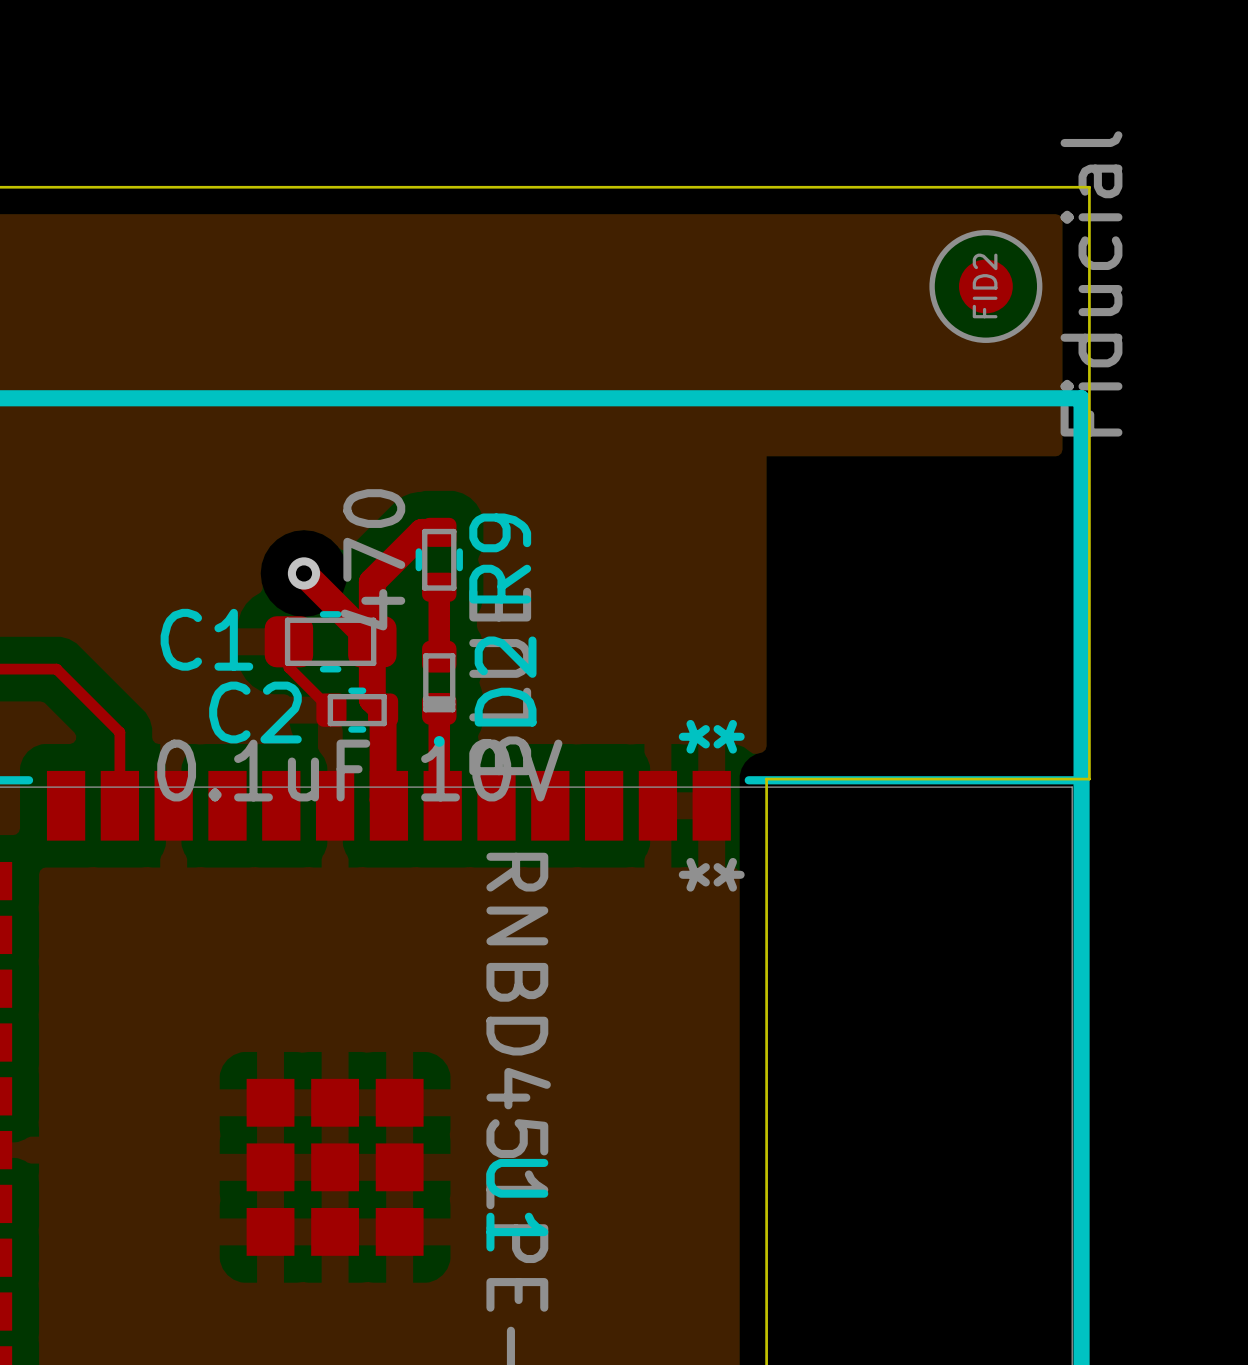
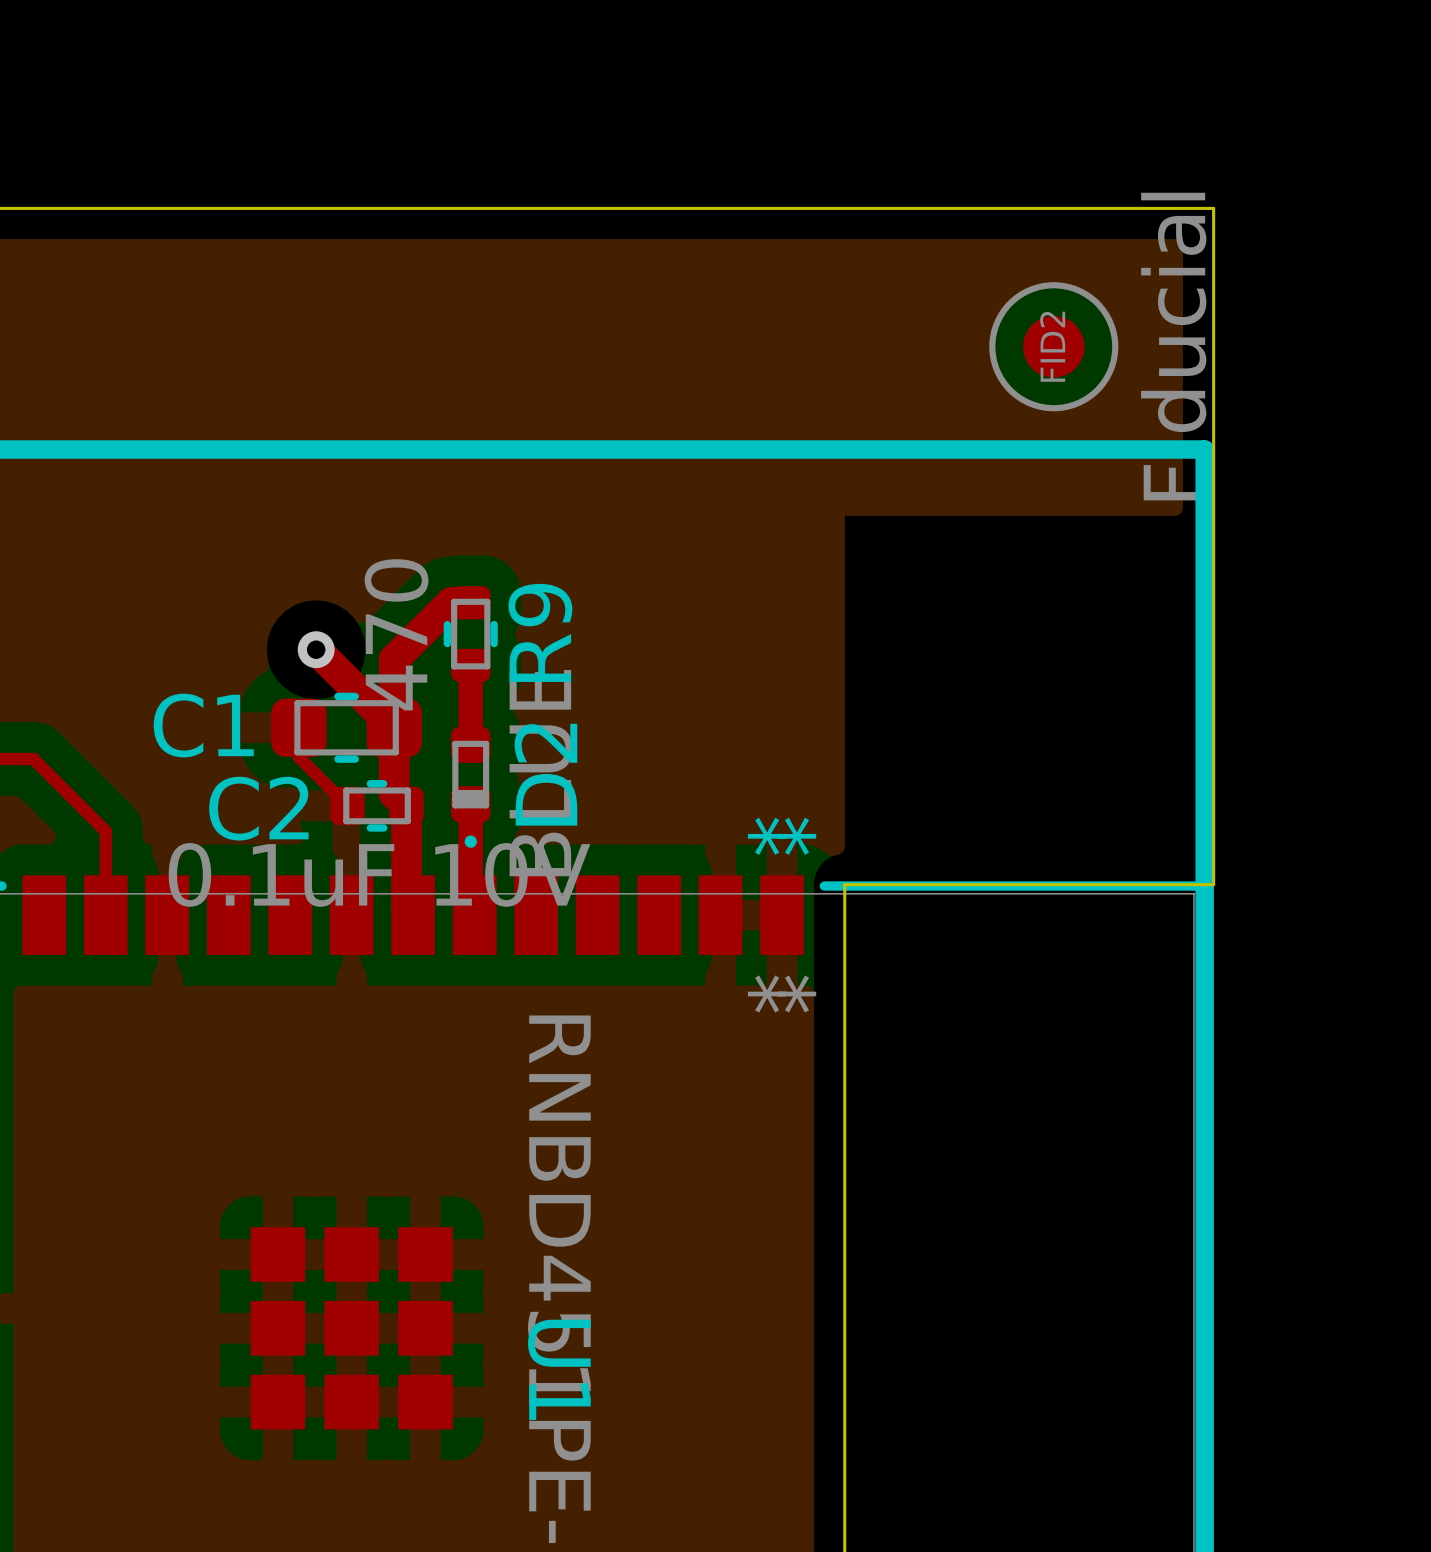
FID2 position: (985, 286) -> (1053, 346)

